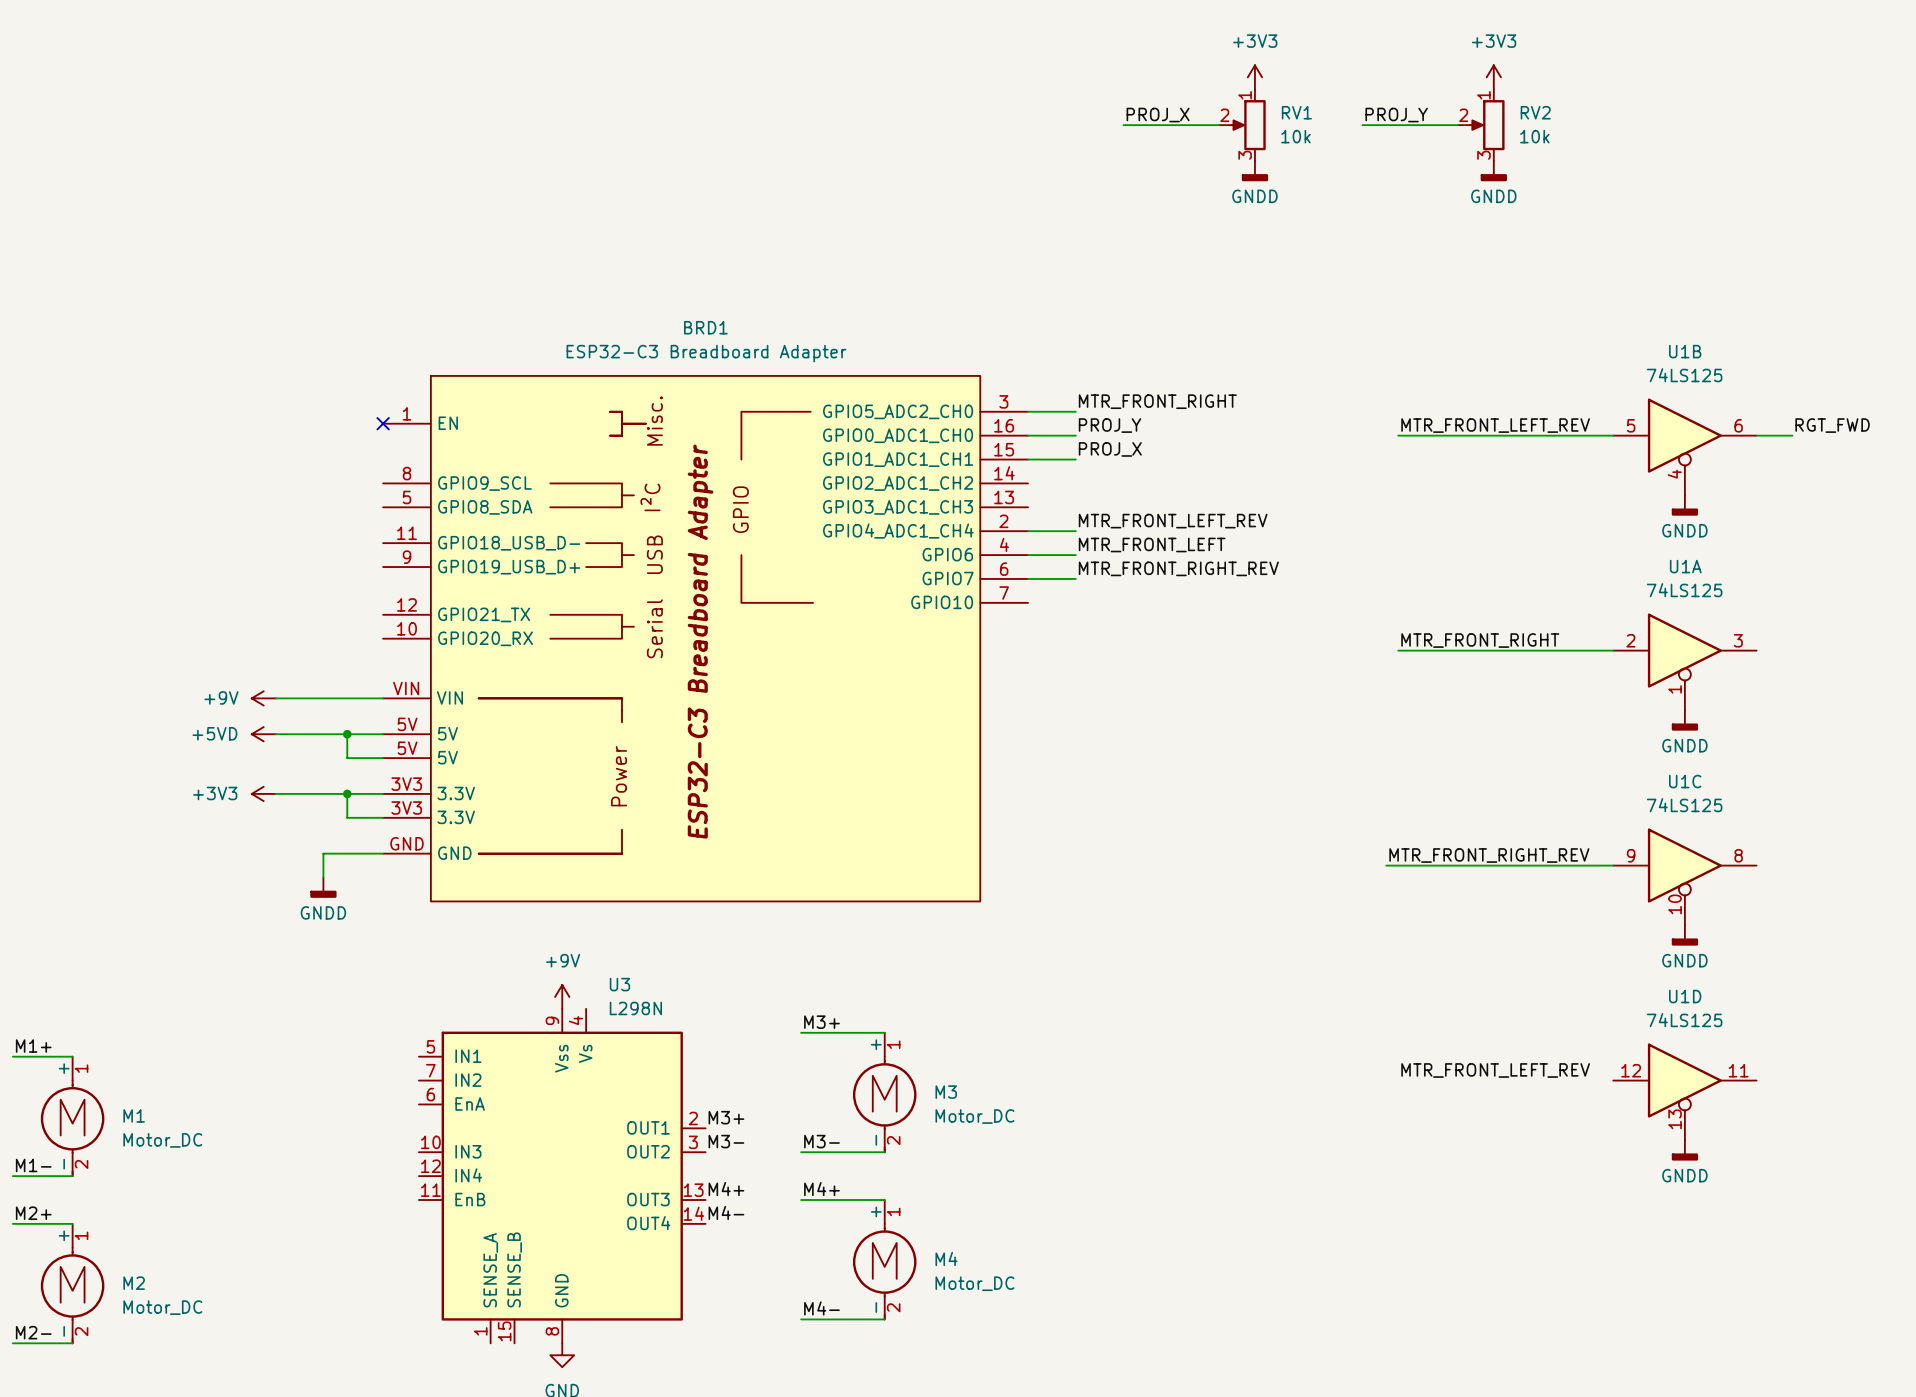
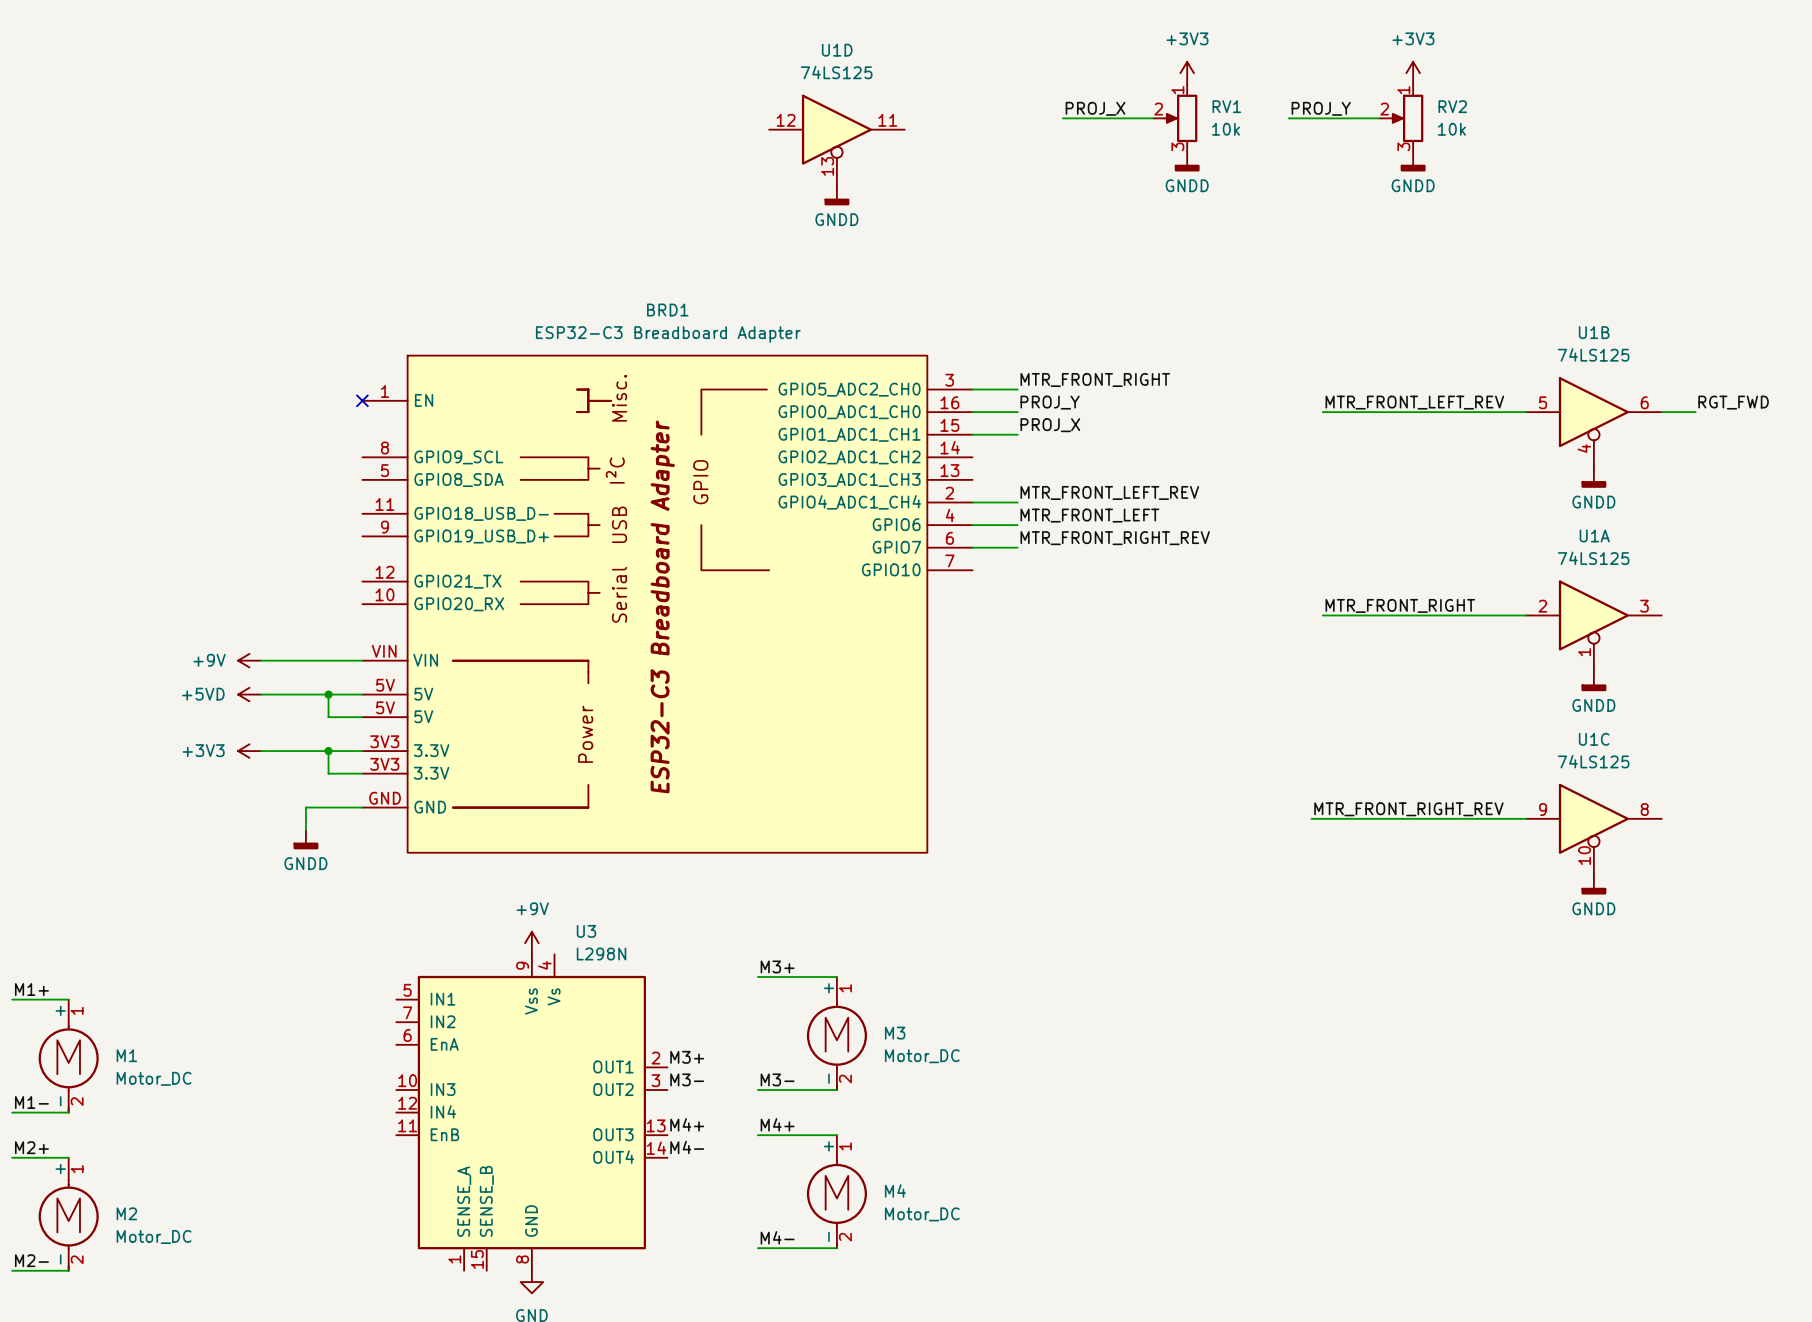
power symbol: none -> GNDD (836, 195)
label: MTR_FRONT_LEFT_REV (1495, 1070) -> none
U1D position: (1684, 1091) -> (836, 140)
power symbol: GNDD (1684, 1150) -> none

